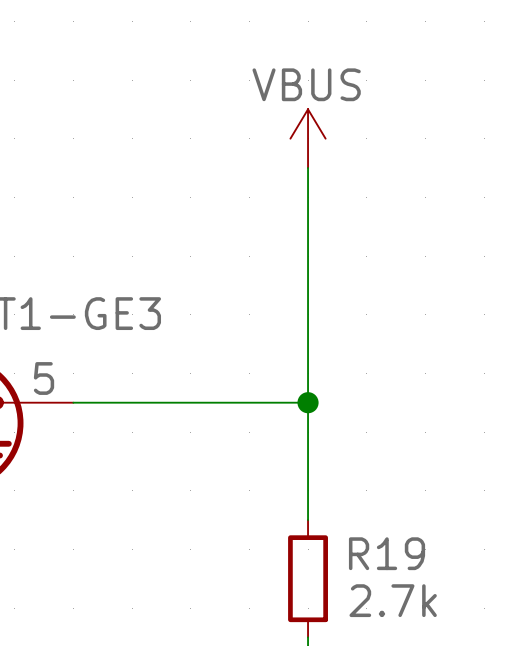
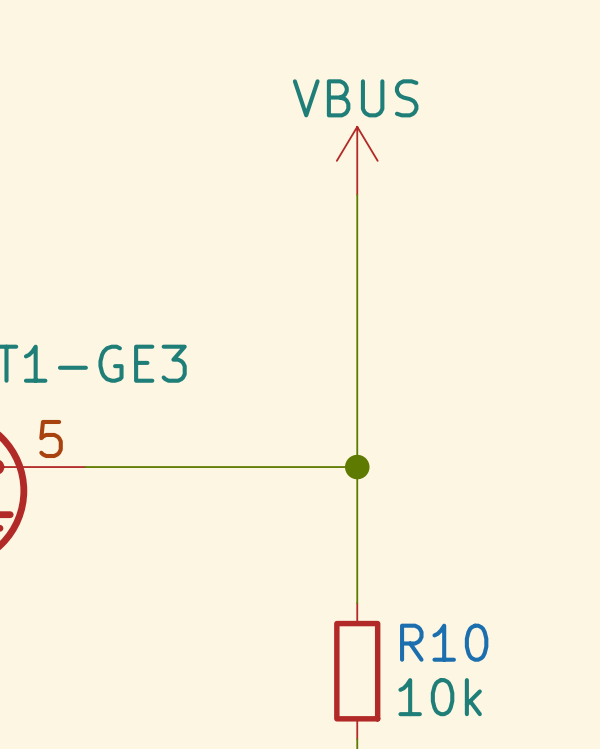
R19 name: R19 (387, 553) -> R10 (444, 642)
R19 value: 2.7k (393, 600) -> 10k (440, 697)

